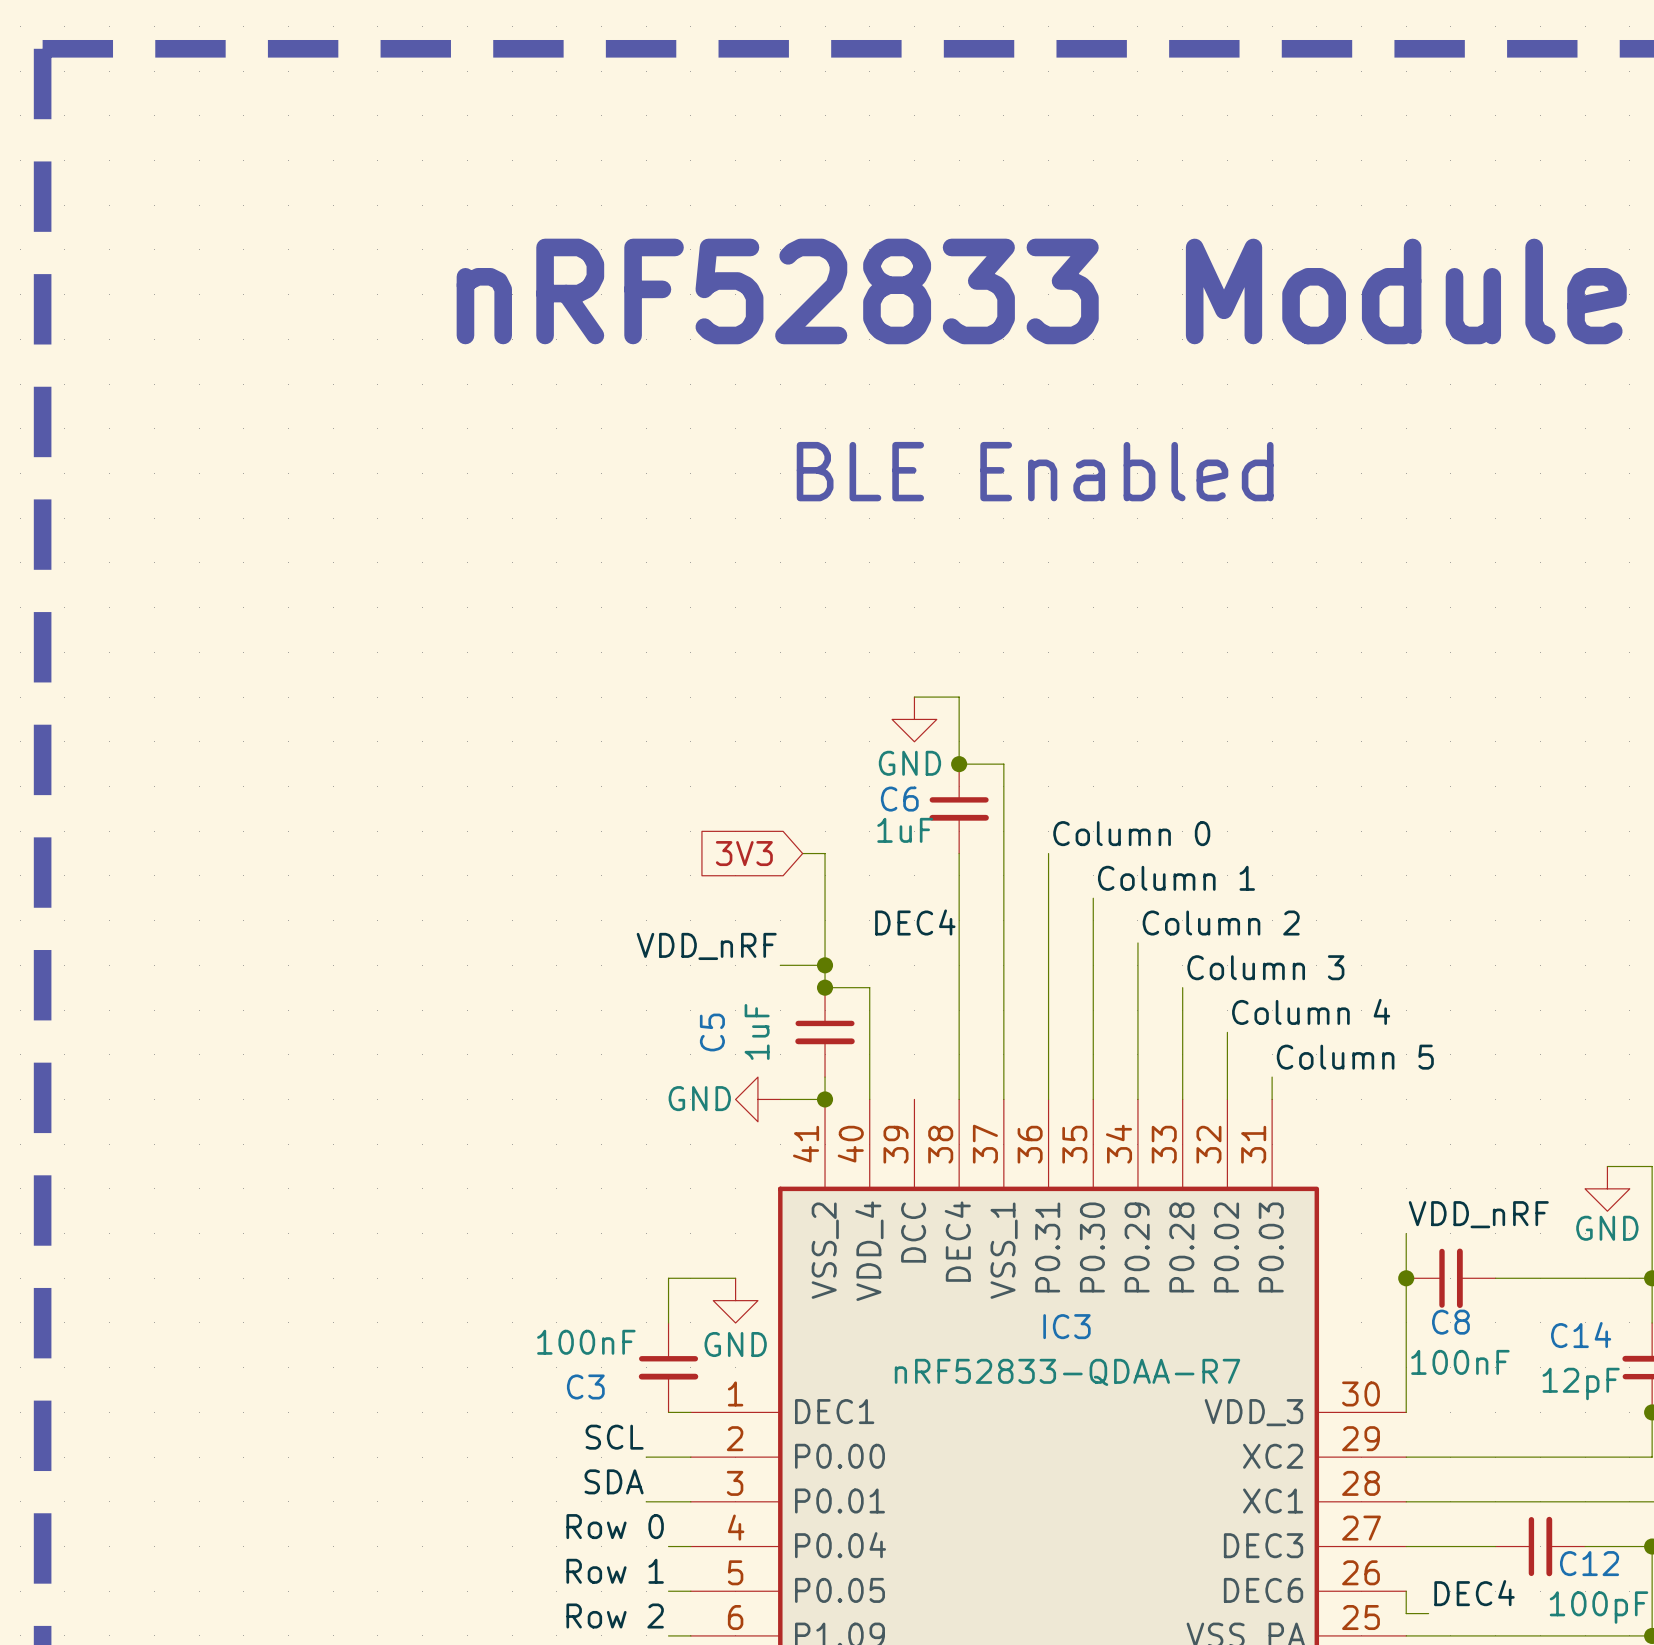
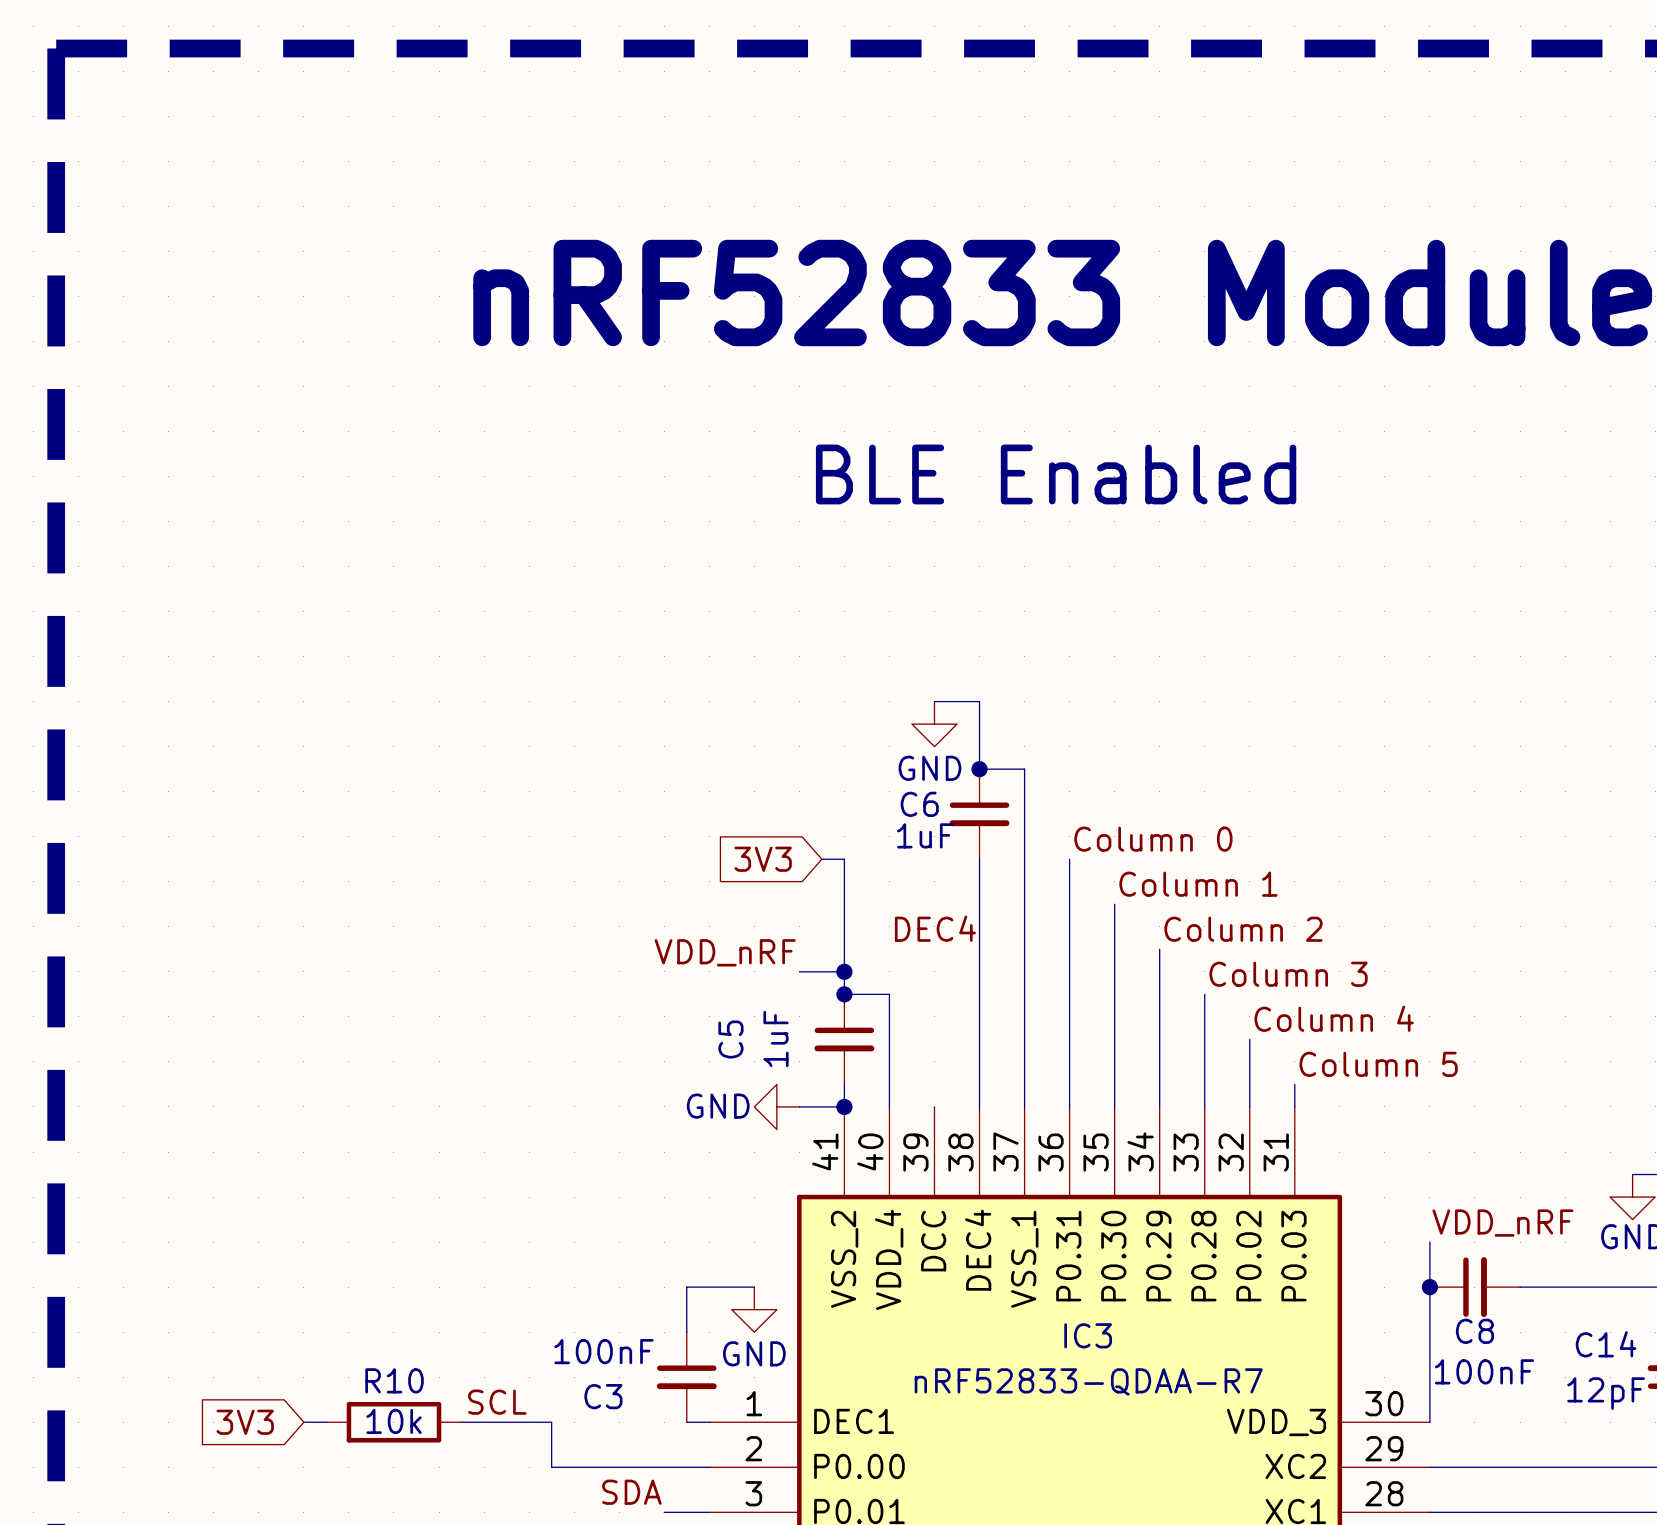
global label: none -> 3V3 (245, 1422)
wire: none -> (303, 1422) (326, 1422)
R10: none -> 10k (393, 1422)
wire: none -> (461, 1422) (551, 1422) (551, 1467) (664, 1467)
label position: SCL (614, 1437) -> SCL (497, 1402)

